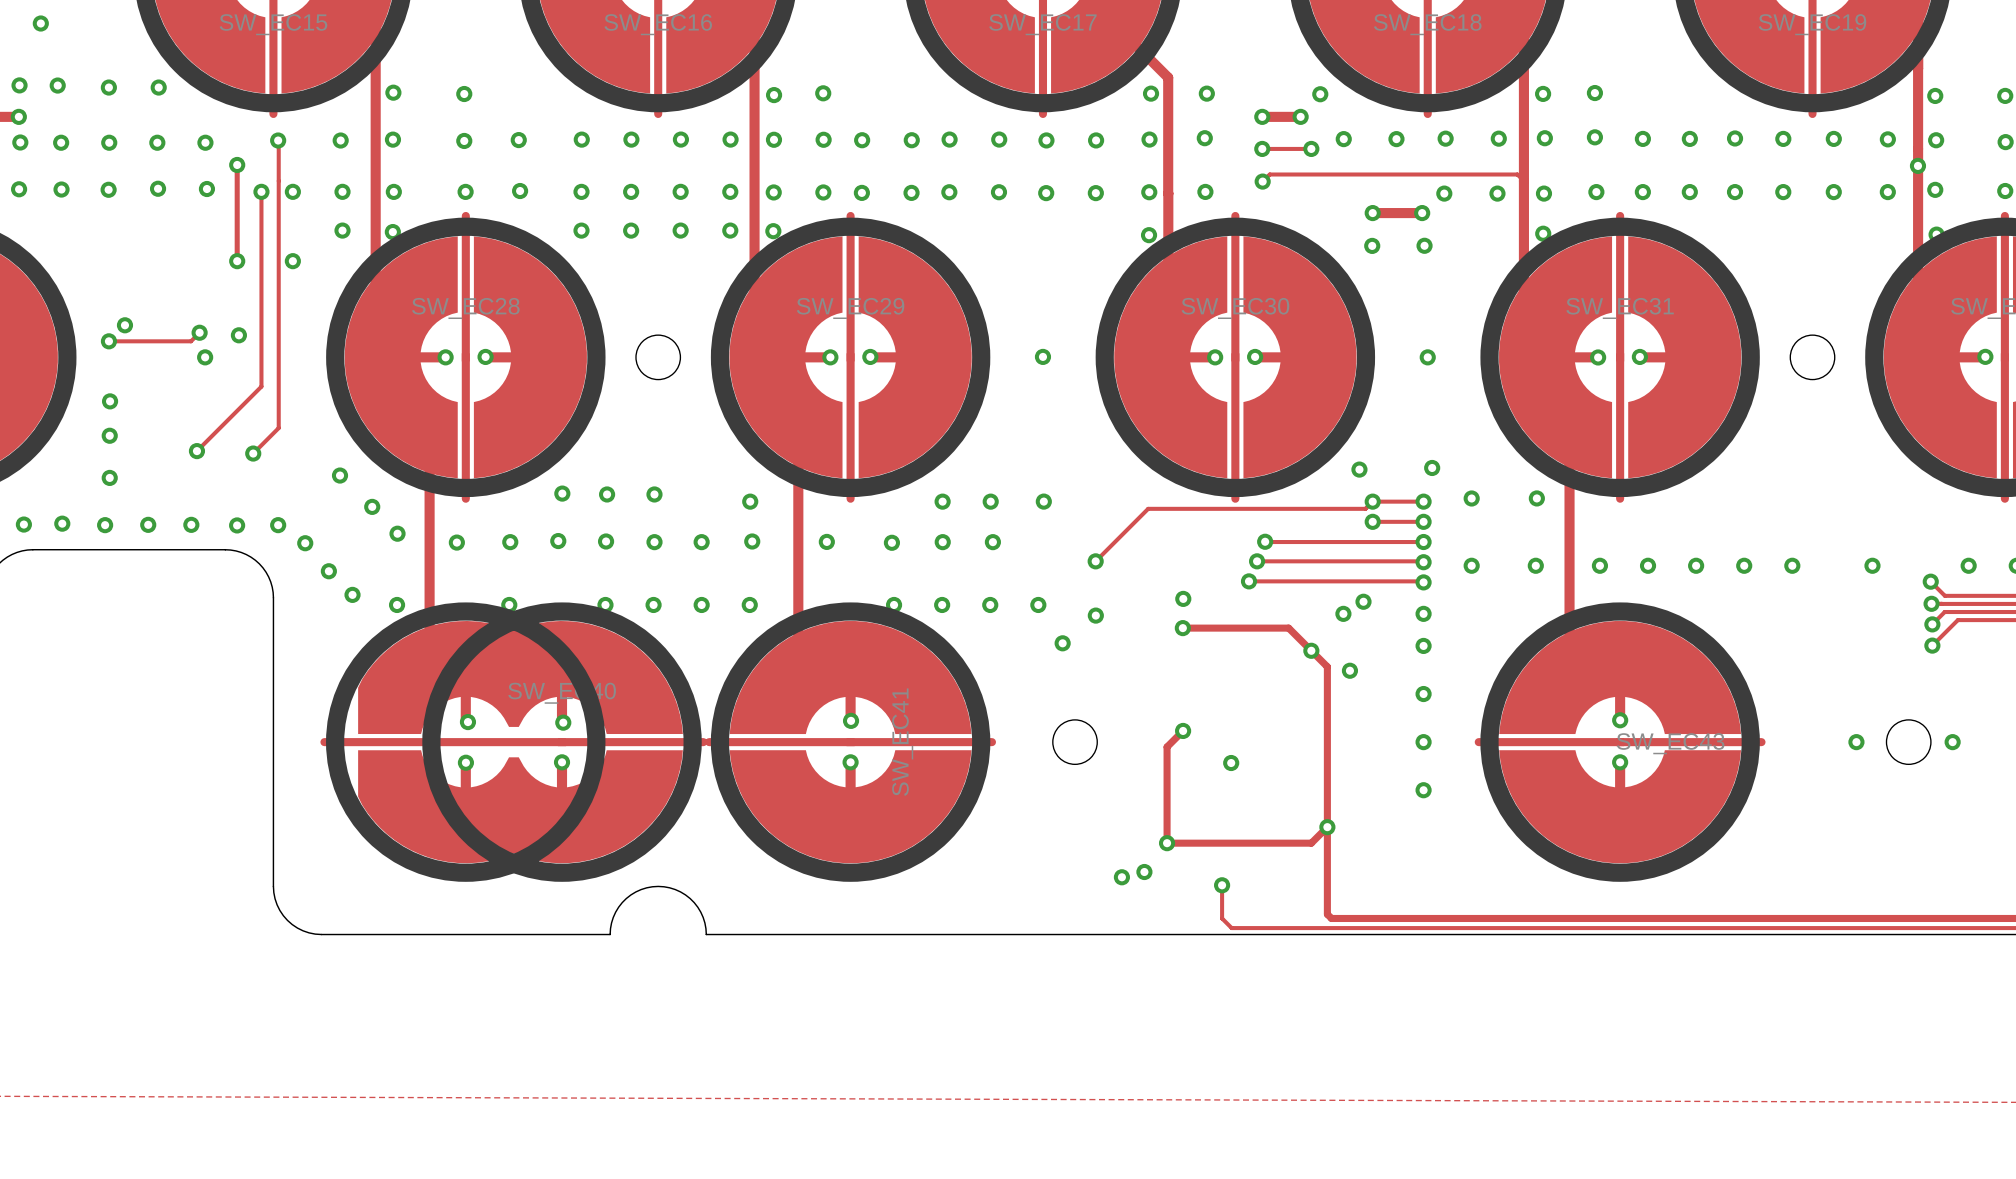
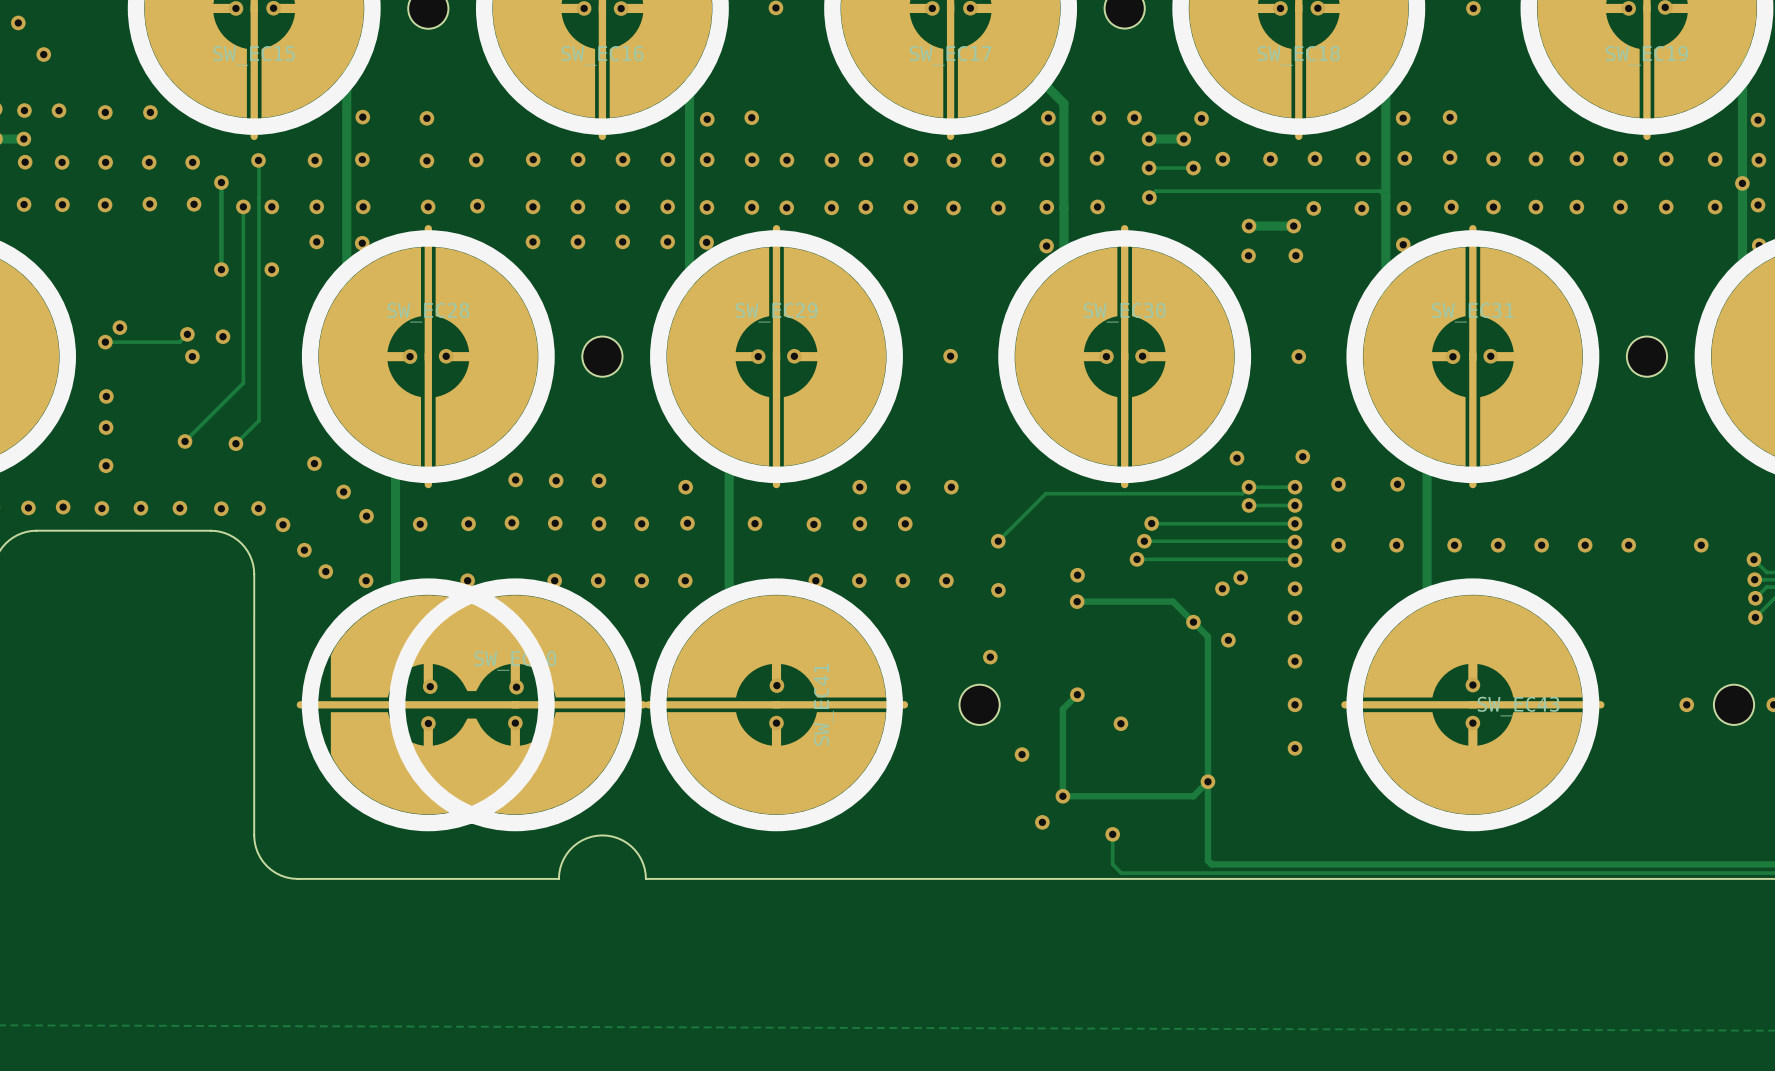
via: none -> (1134, 117)
via position: (1062, 643) -> (990, 657)
via position: (1121, 877) -> (1022, 754)

